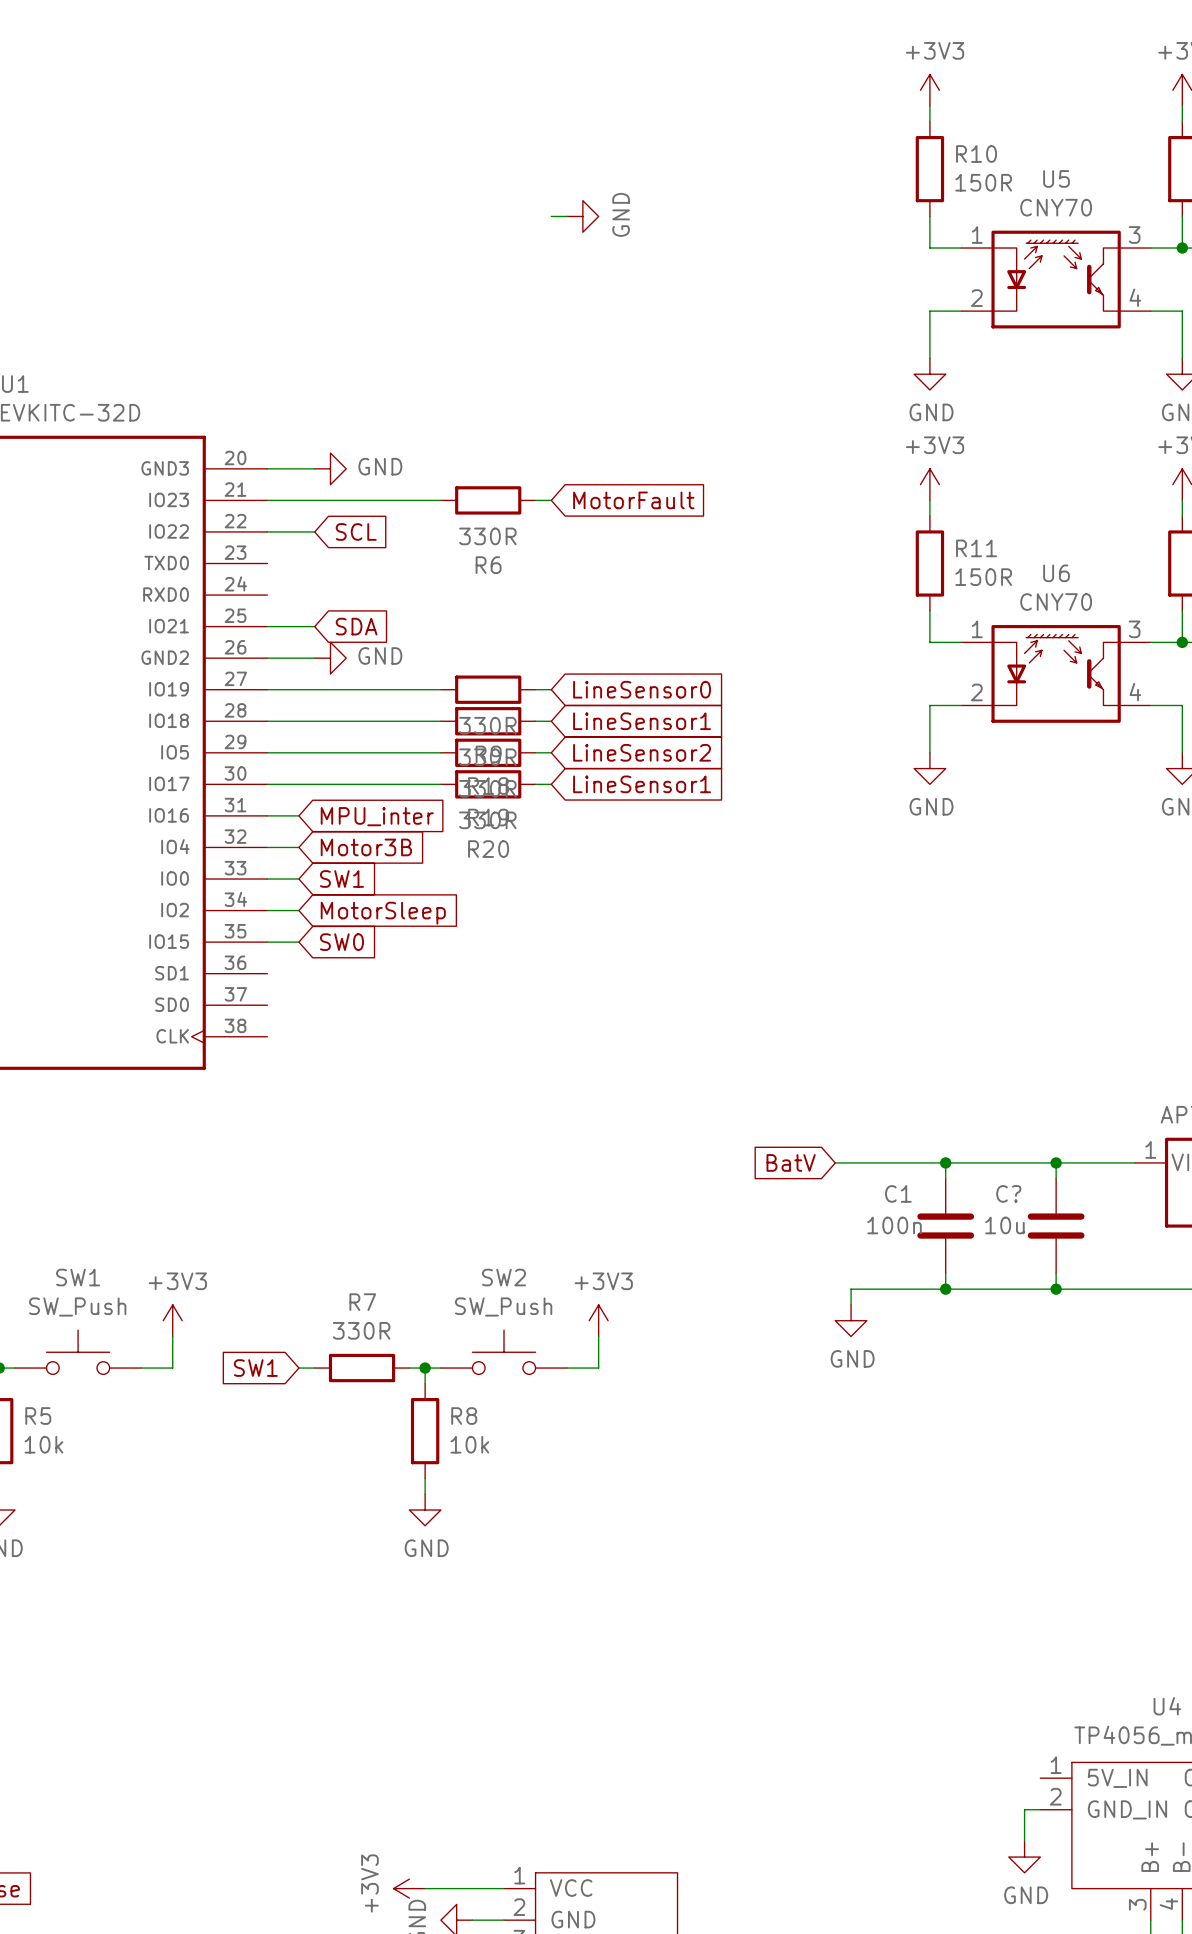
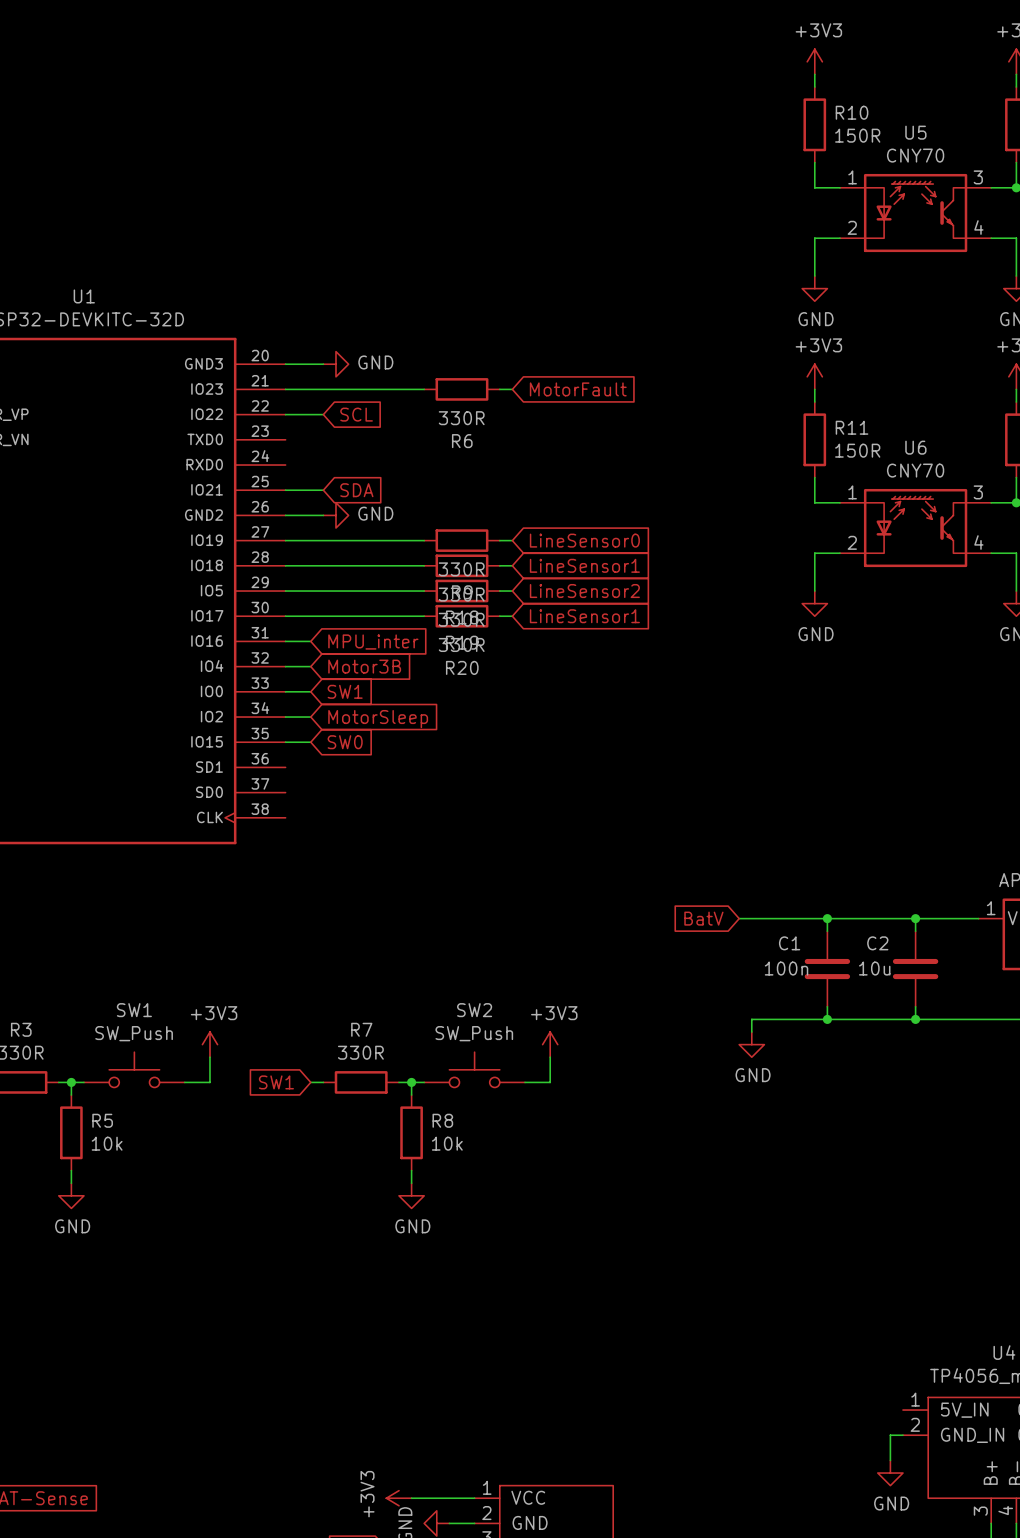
wire: (551, 216) (567, 216) -> none
power symbol: GND (582, 216) -> none
C? name: C? (1008, 1193) -> C2 (877, 943)

